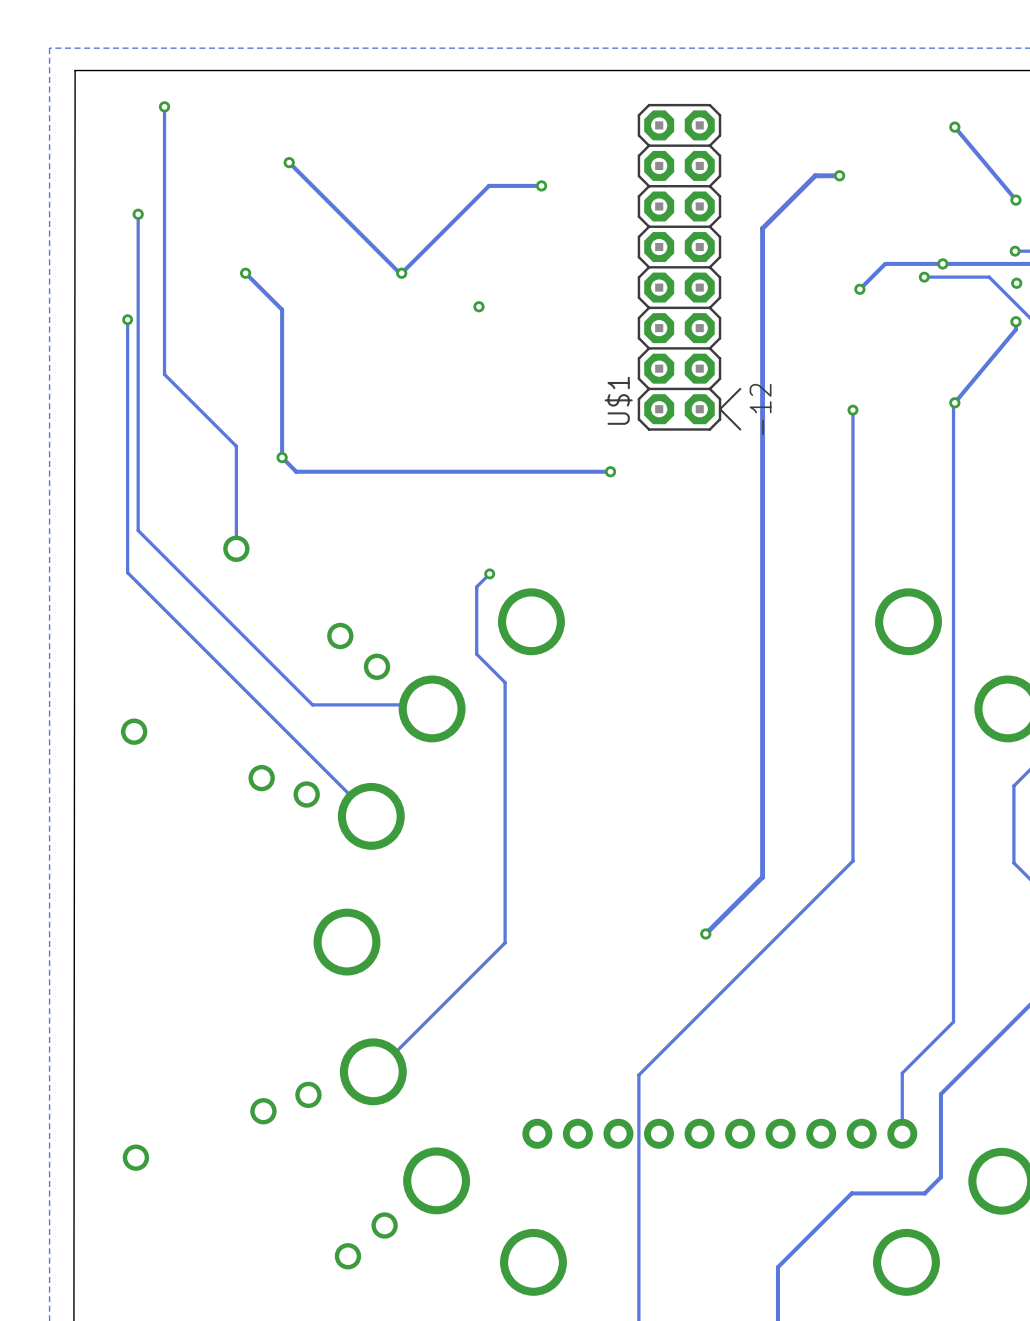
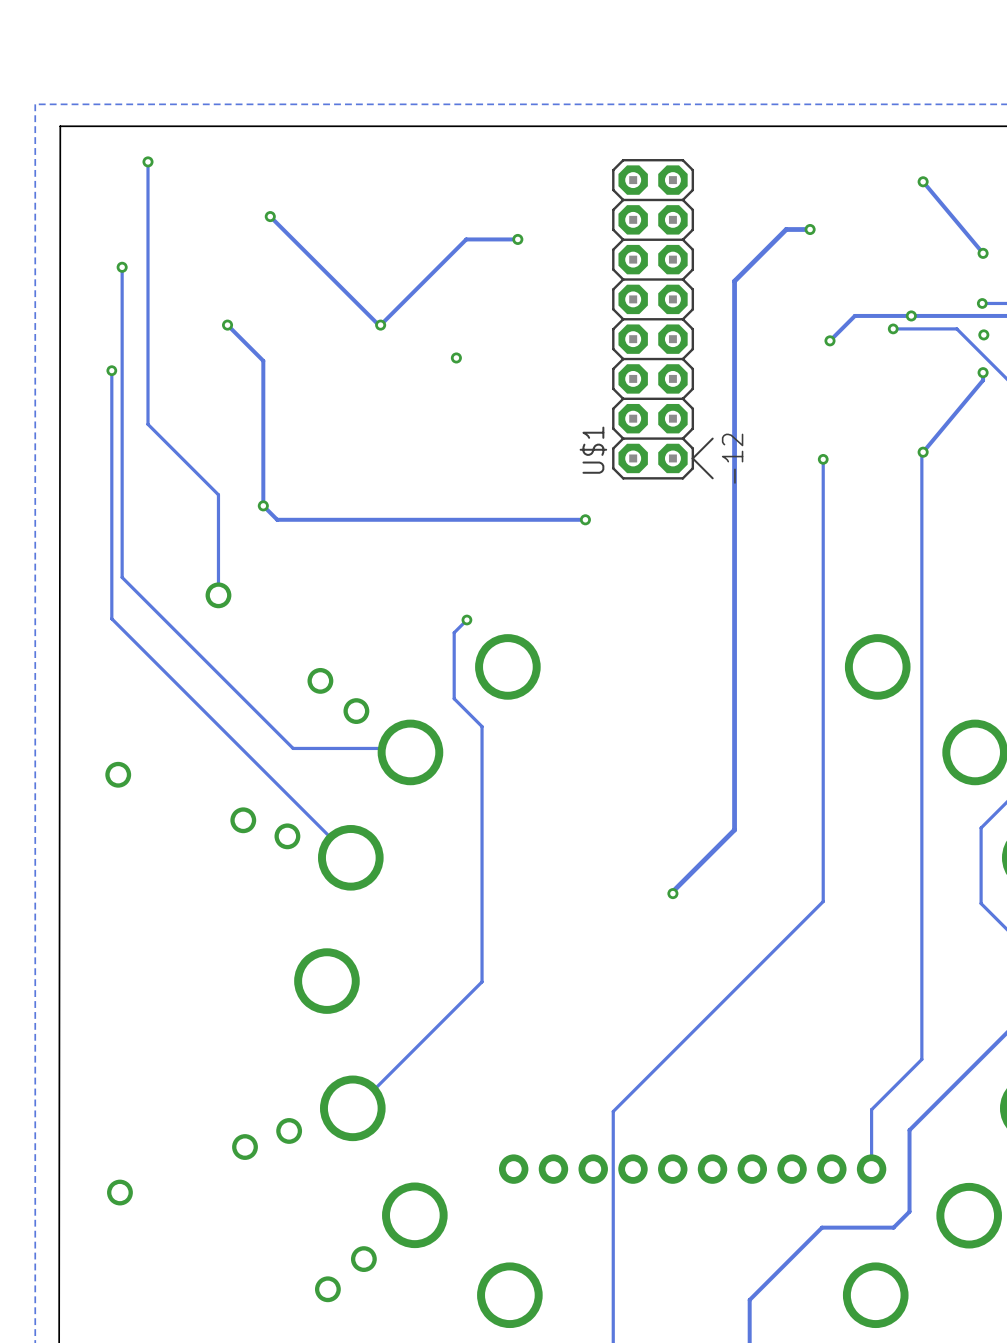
track: (762, 787) (762, 877) (705, 933) -> (734, 829) (672, 893)
via position: (705, 933) -> (672, 893)

